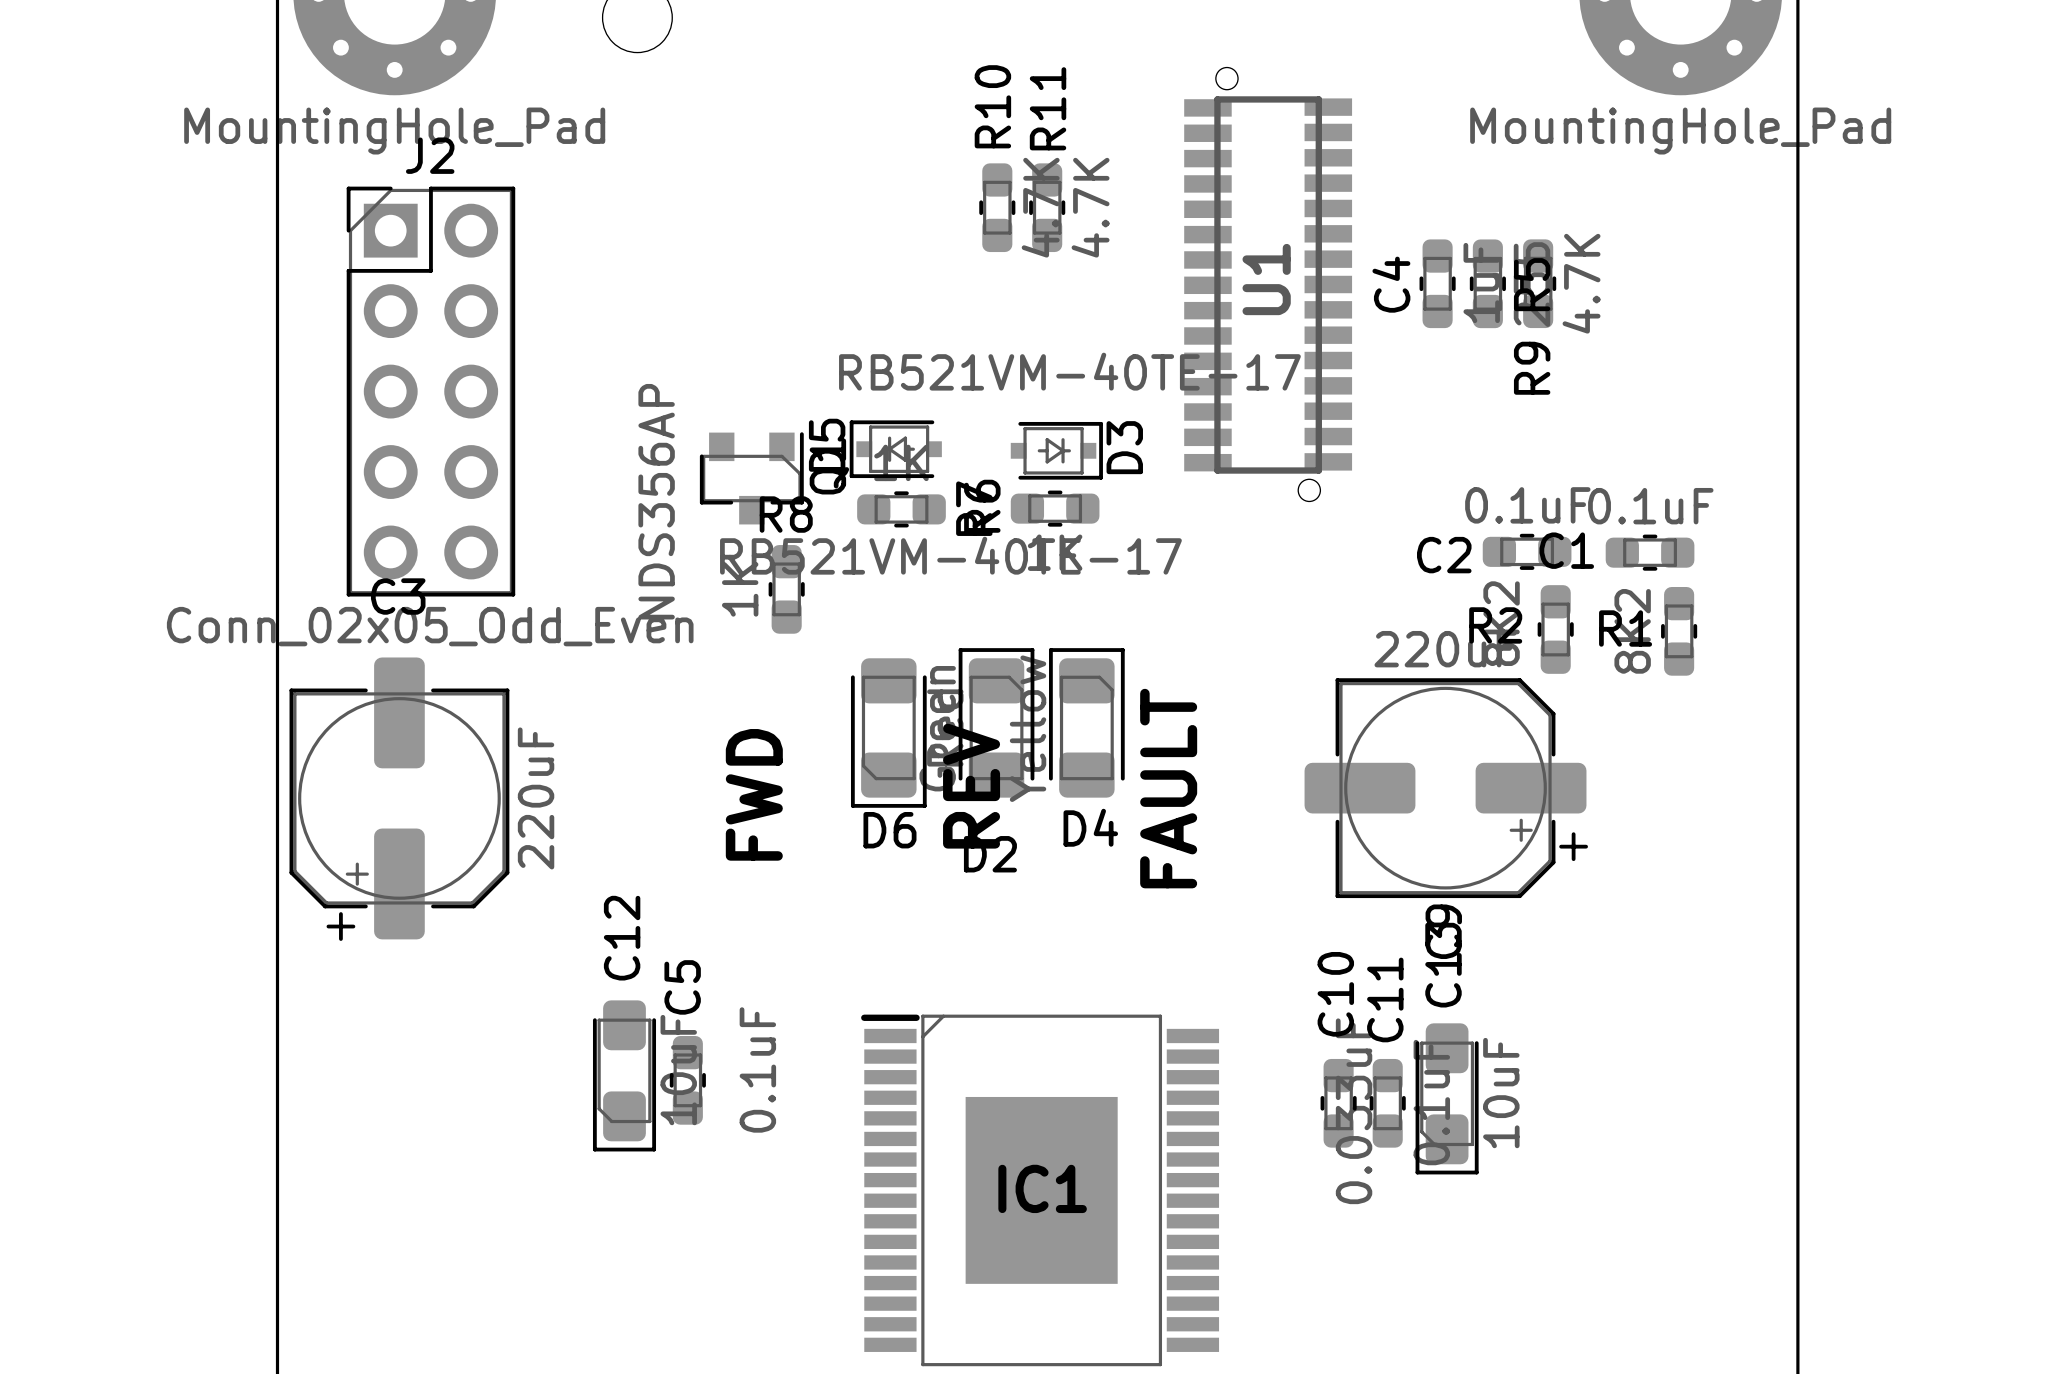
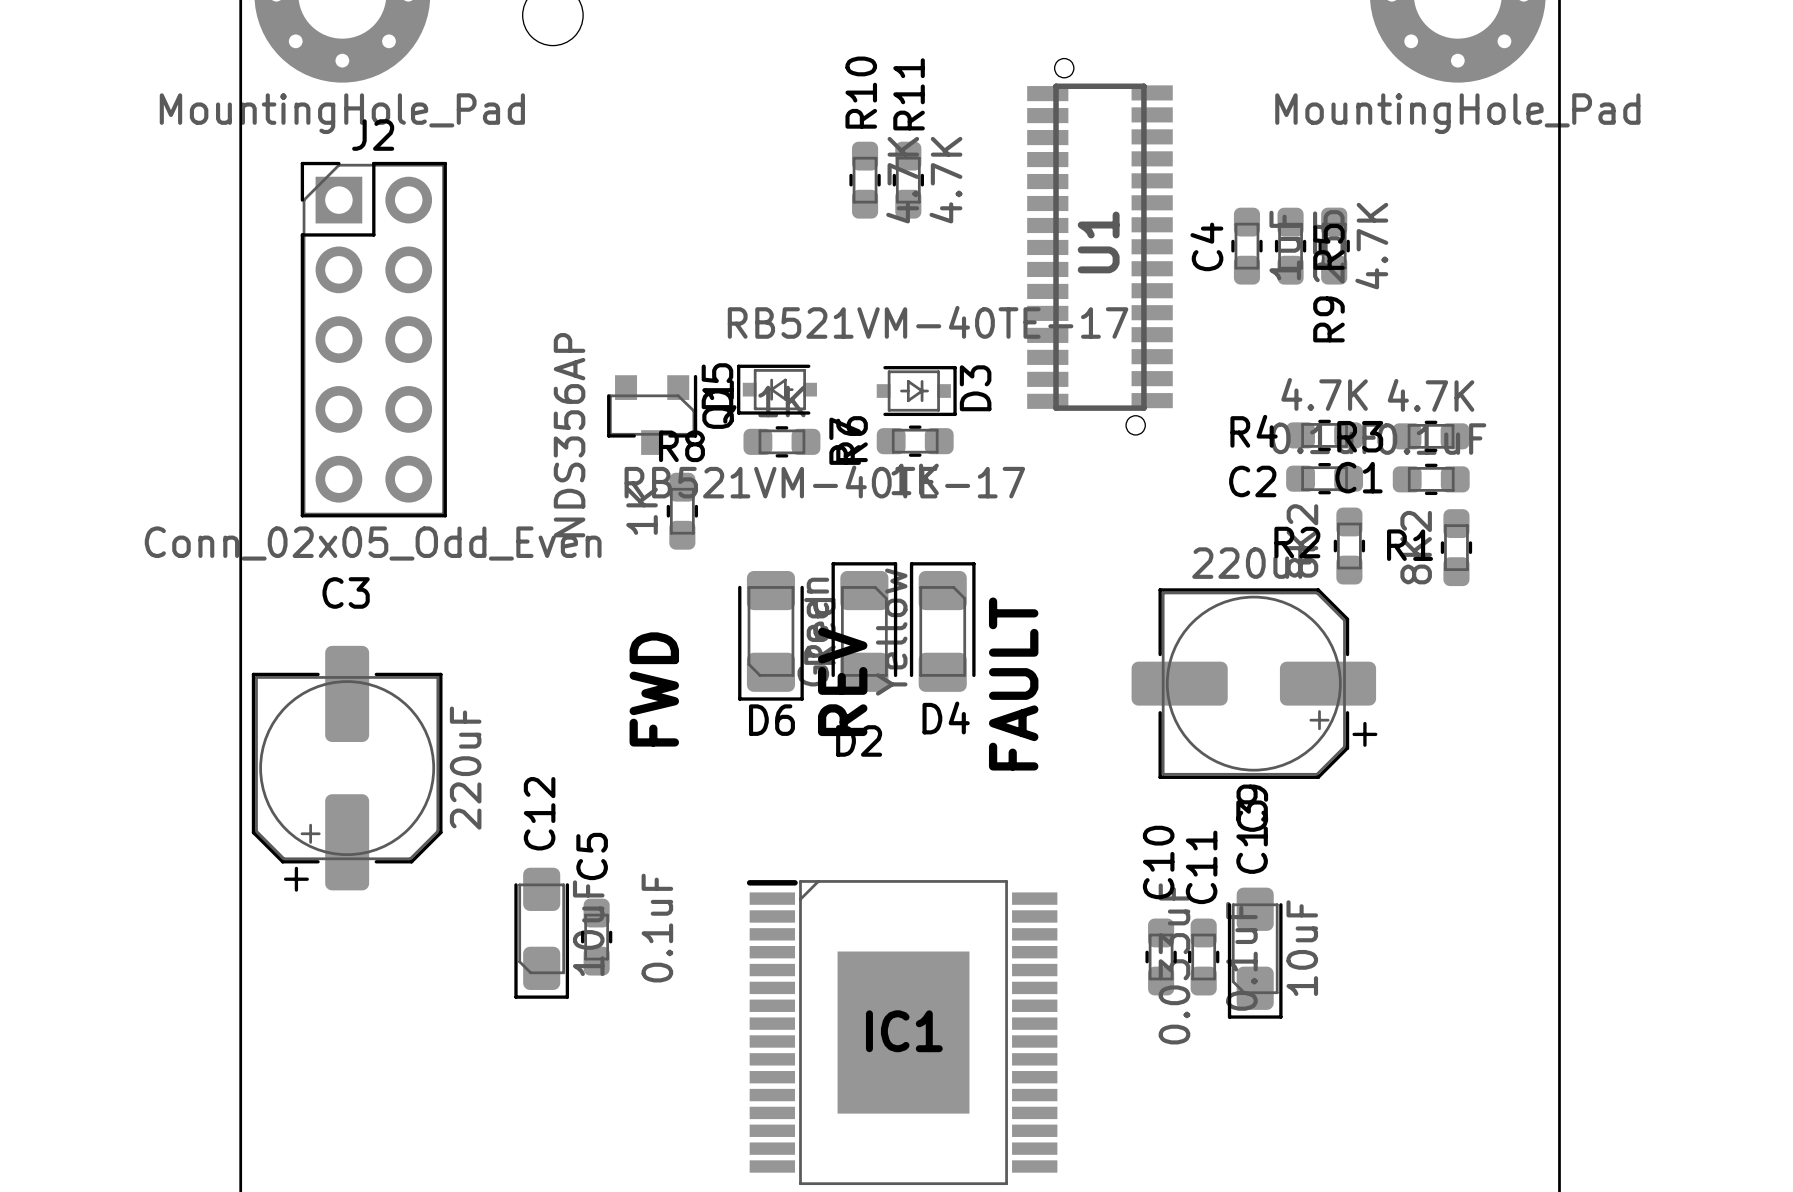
R4: none -> 4.7K (1324, 435)
R3: none -> 4.7K (1431, 436)
C3 position: (399, 799) -> (347, 768)

